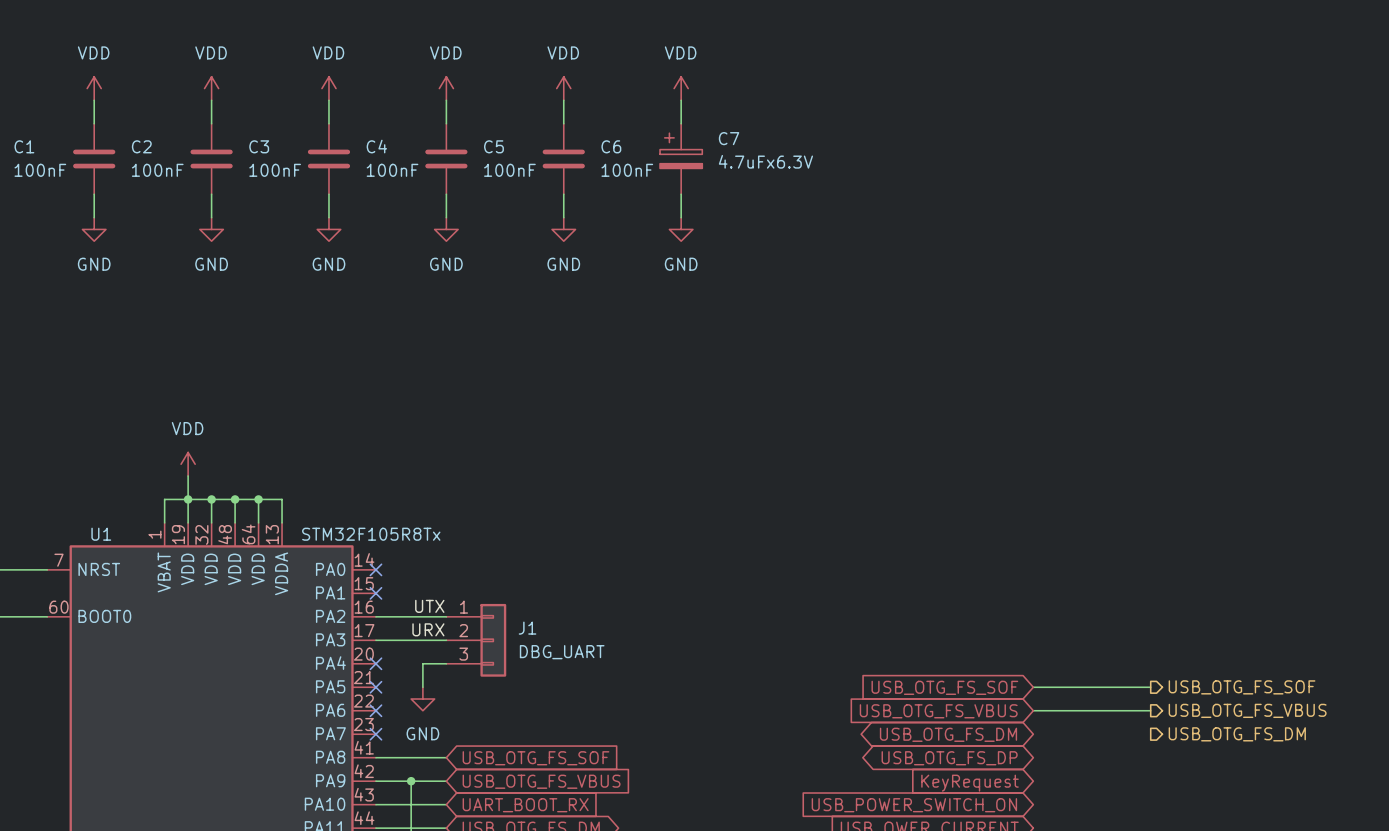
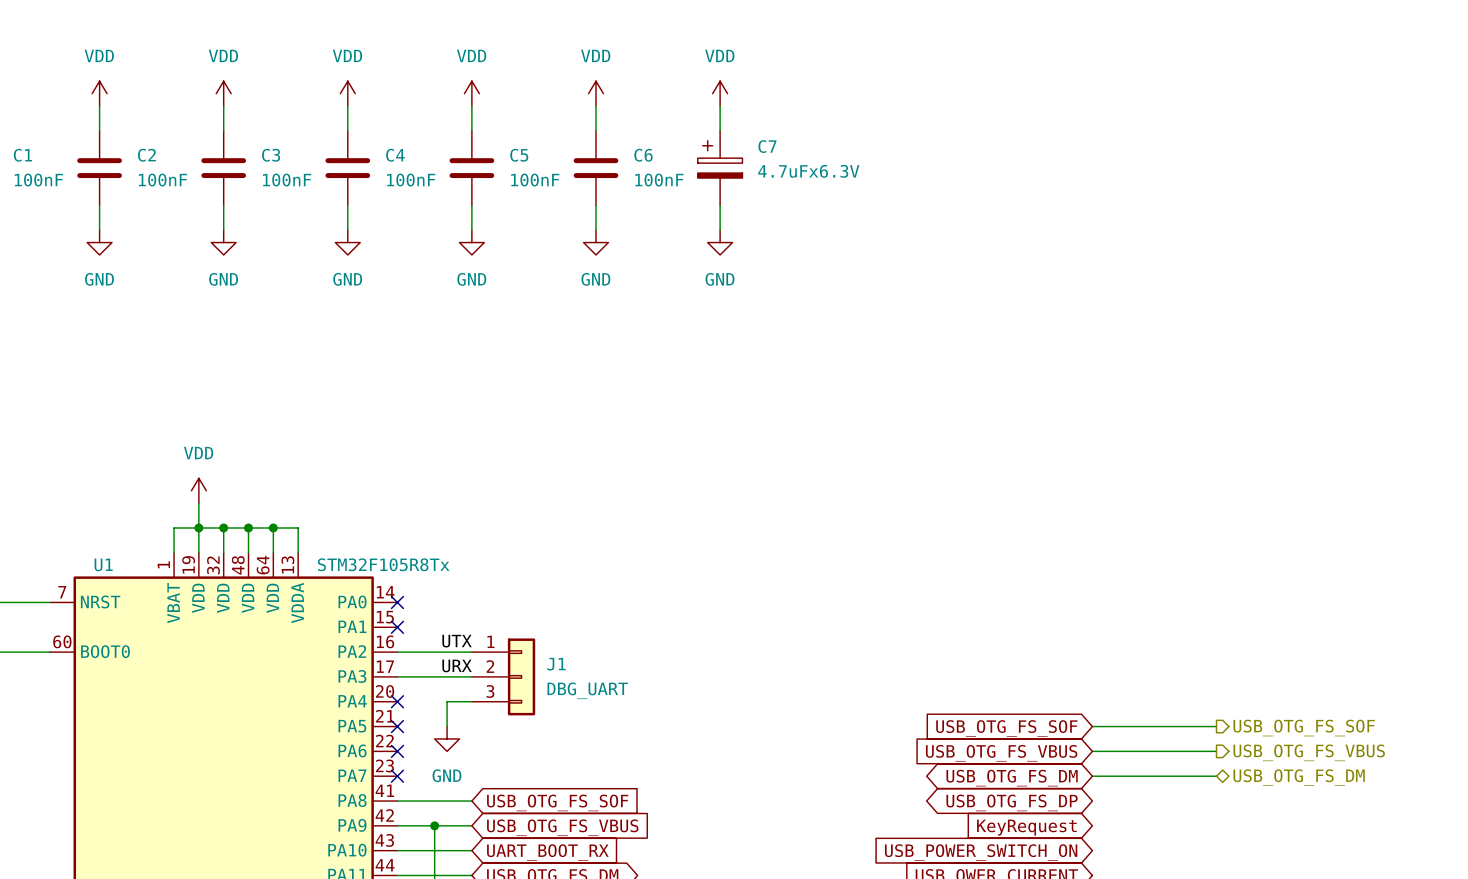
wire: none -> (1092, 776) (1216, 776)
hierarchical label shape: output (1237, 734) -> bidirectional (1299, 777)

